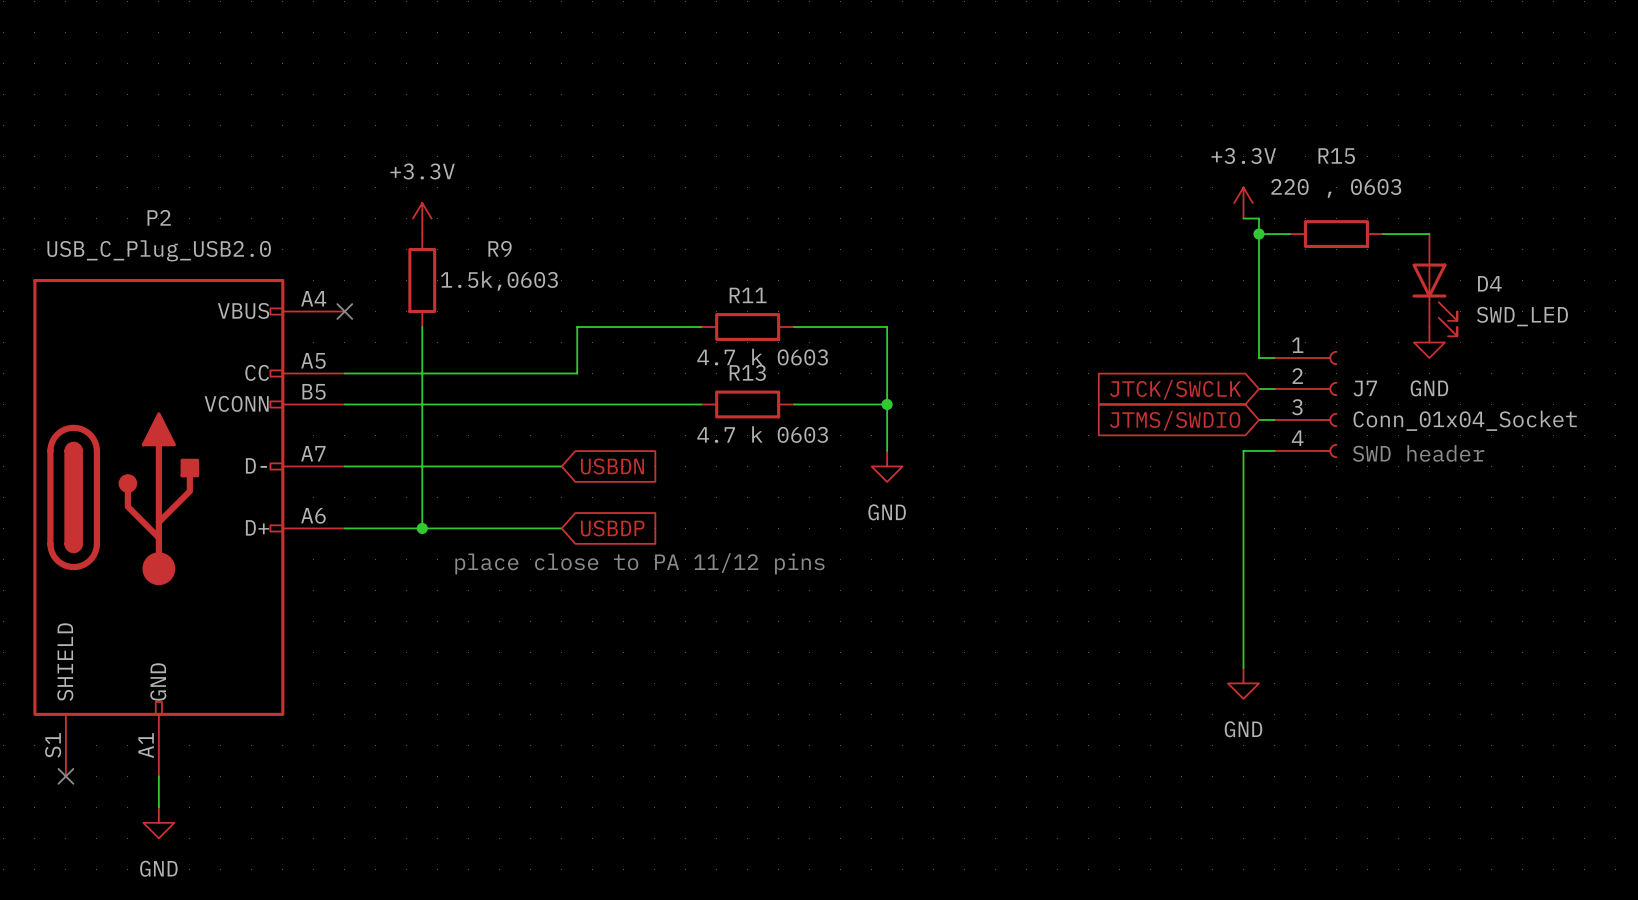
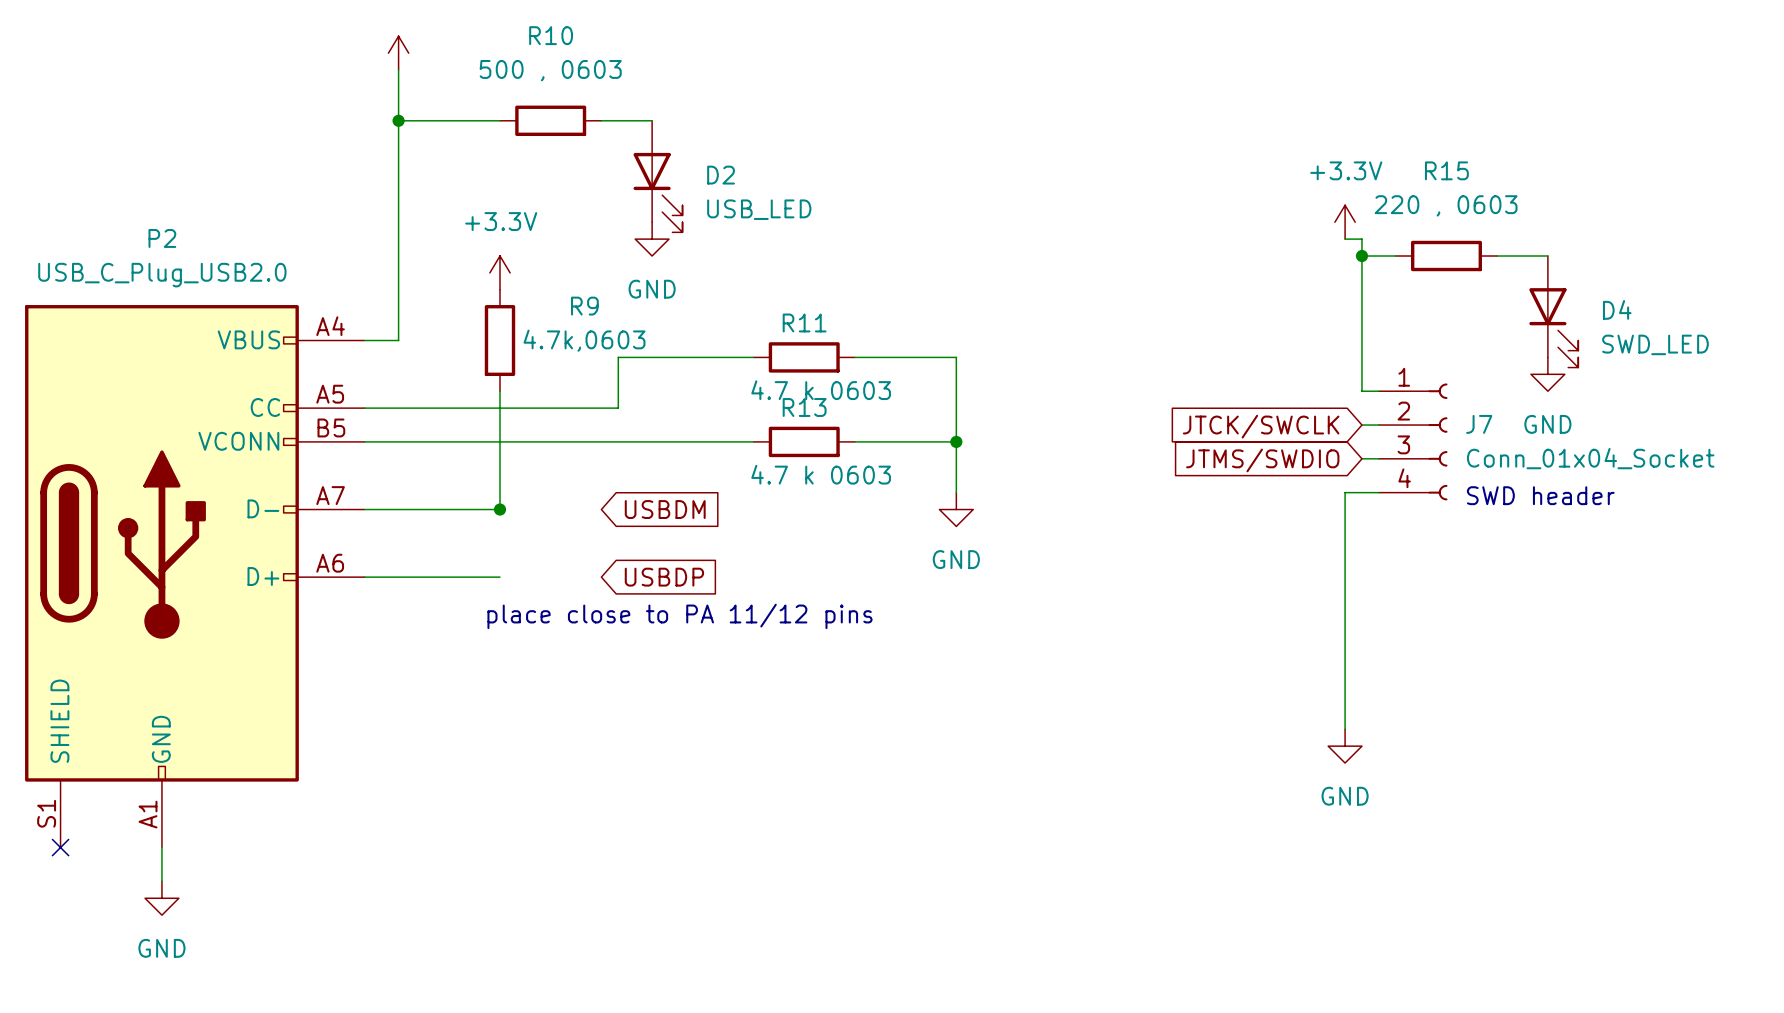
power symbol: none -> (398, 53)
wire: none -> (398, 70) (398, 340) (364, 340)
wire: none -> (398, 120) (499, 120)
junction: none -> (398, 120)
R10: none -> 500 , 0603 (550, 120)
wire: none -> (601, 120) (652, 120)
D2: none -> USB_LED (658, 176)
power symbol position: +3.3V (422, 218) -> +3.3V (499, 272)
power symbol: none -> GND (652, 239)
R9 position: (422, 280) -> (499, 340)
R9 value: 1.5k,0603 (499, 281) -> 4.7k,0603 (584, 340)
no-connect mark: (344, 311) -> none
wire: (422, 327) (422, 528) -> none
wire: (468, 466) (561, 466) -> (499, 509) (499, 391)
junction: none -> (499, 509)
global label: USBDN (612, 466) -> USBDM (665, 509)
junction: (422, 528) -> none
wire: (468, 528) (561, 528) -> none

